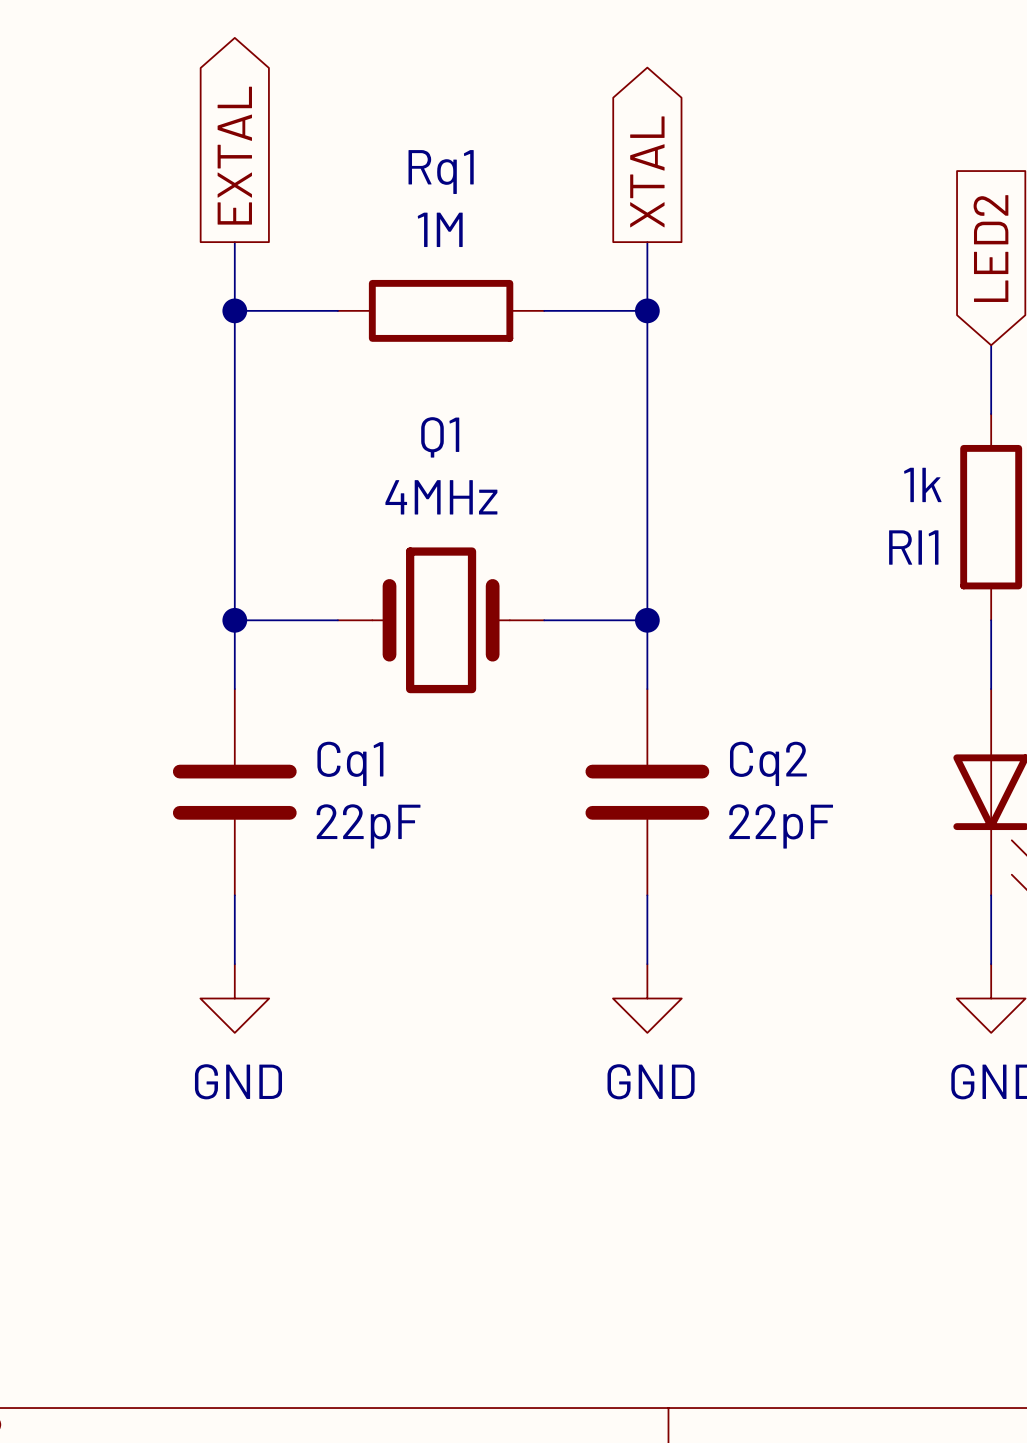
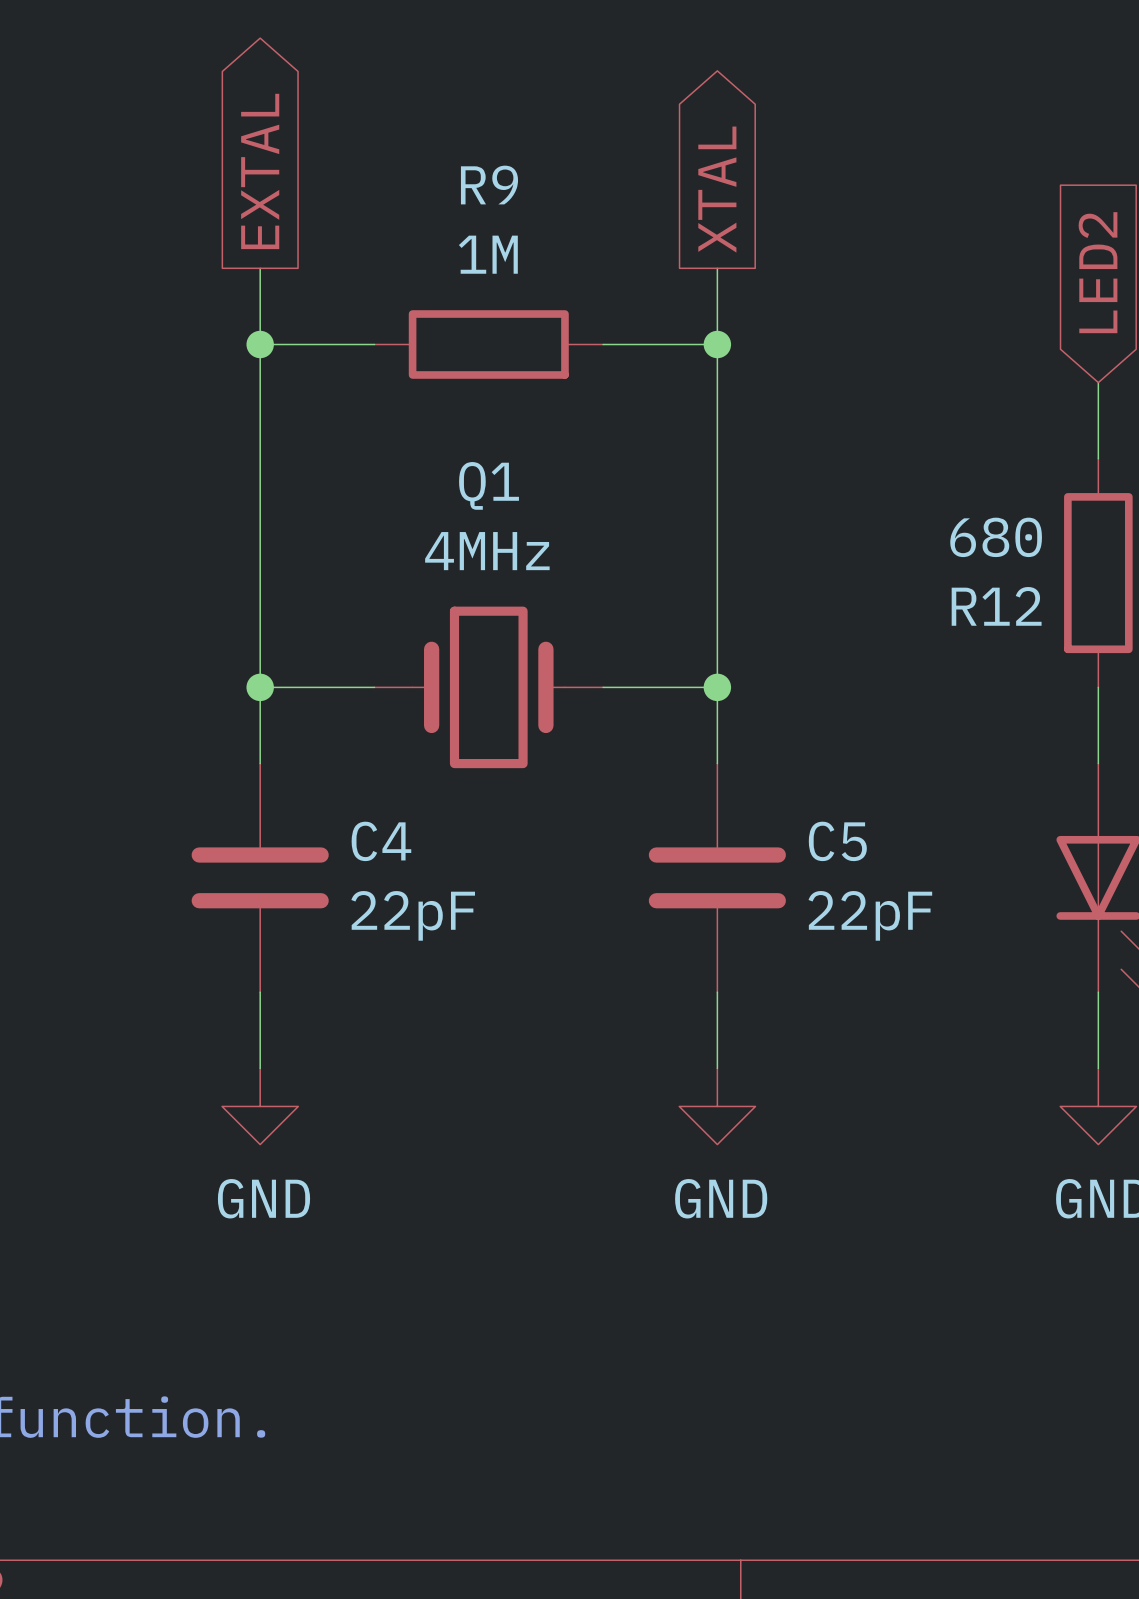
Rq1 name: Rq1 (441, 172) -> R9 (489, 185)
Rl1 value: 1k (922, 484) -> 680 (996, 537)
Rl1 name: Rl1 (913, 547) -> R12 (996, 606)
Cq1 name: Cq1 (350, 763) -> C4 (381, 841)
Cq2 name: Cq2 (768, 763) -> C5 (837, 841)

